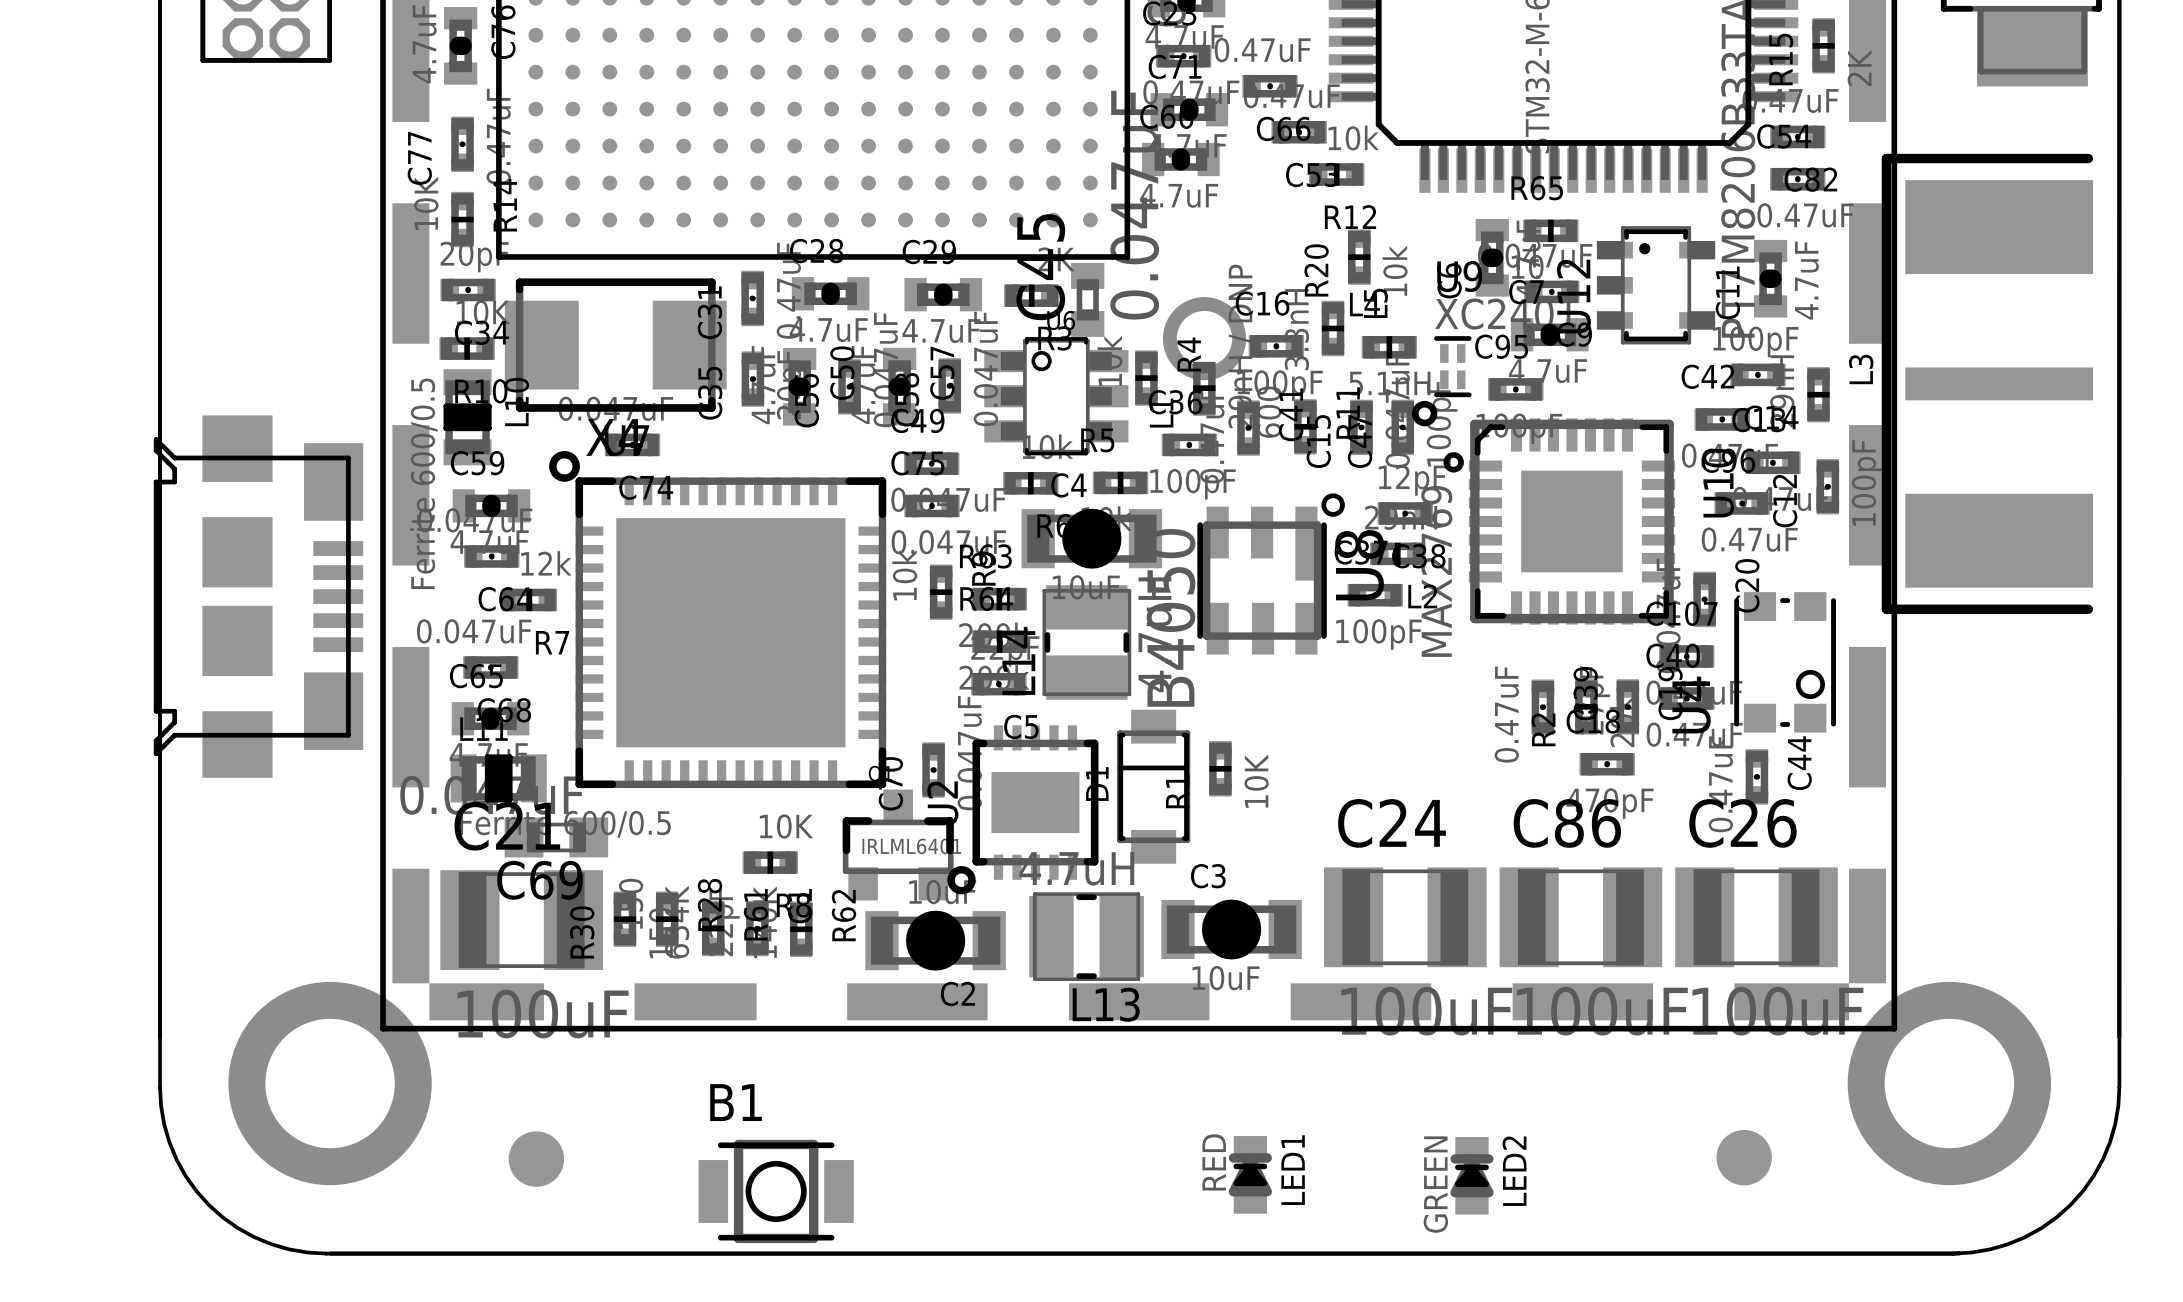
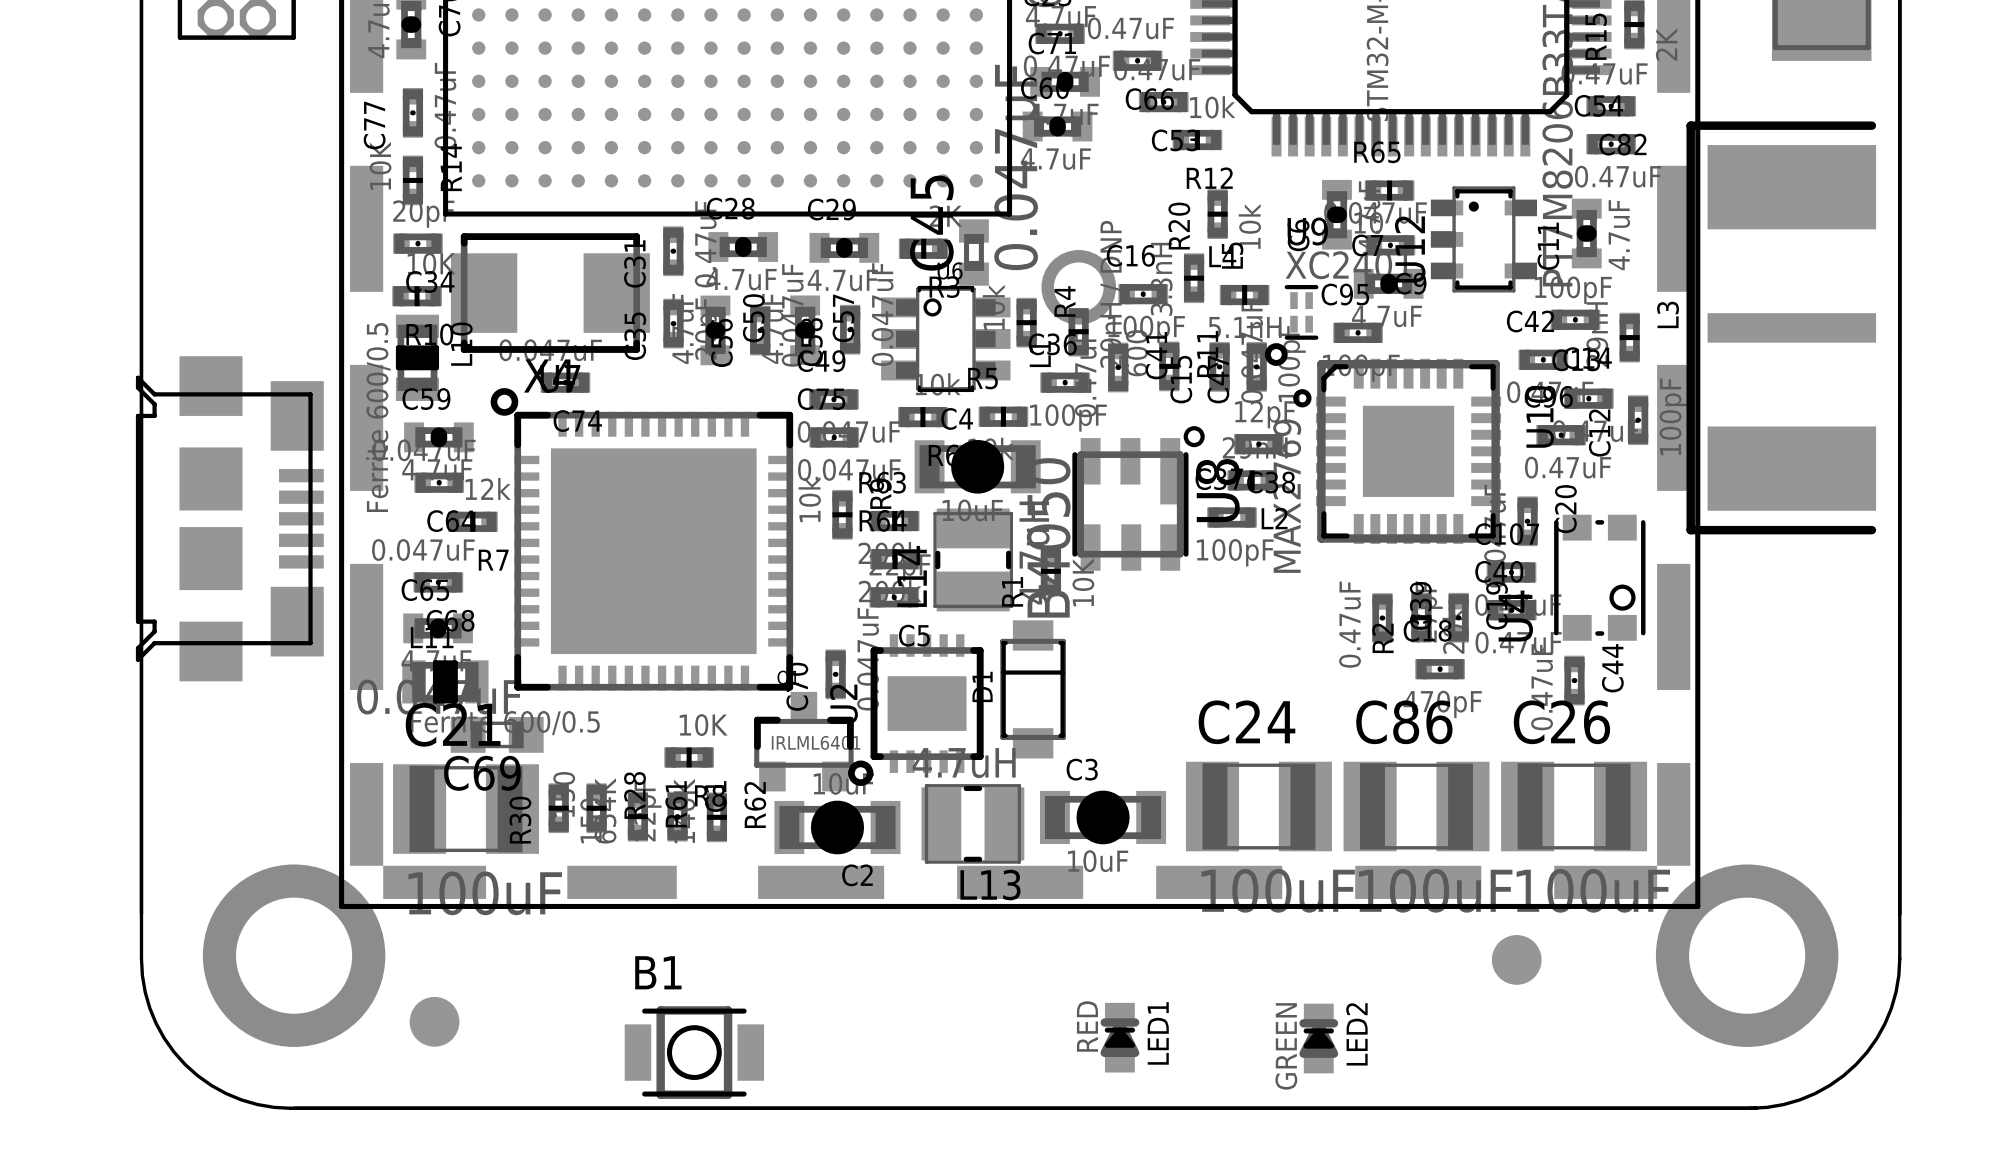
R1 position: (1220, 768) -> (1050, 571)
part position: (1744, 1157) -> (1516, 959)
part position: (536, 1159) -> (434, 1021)

